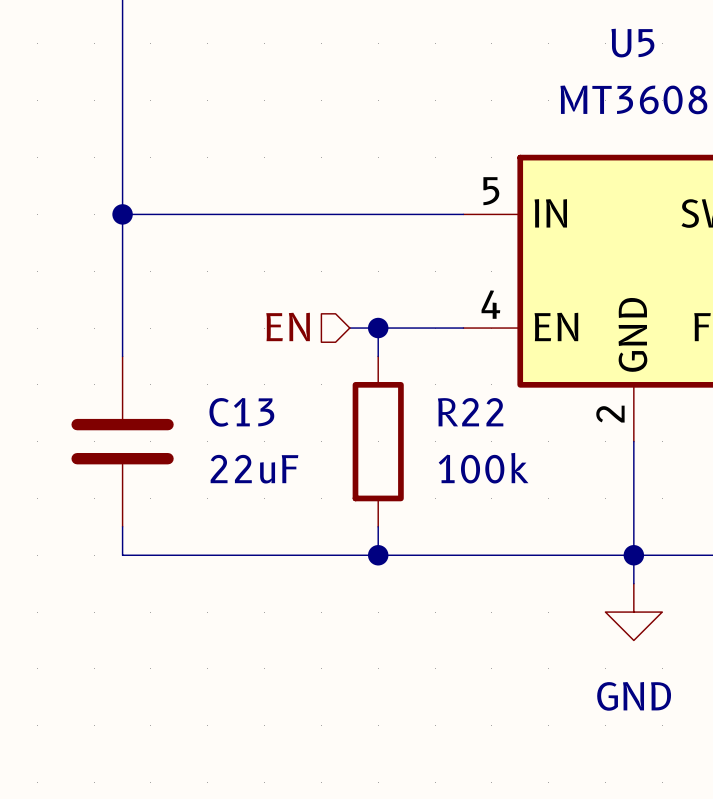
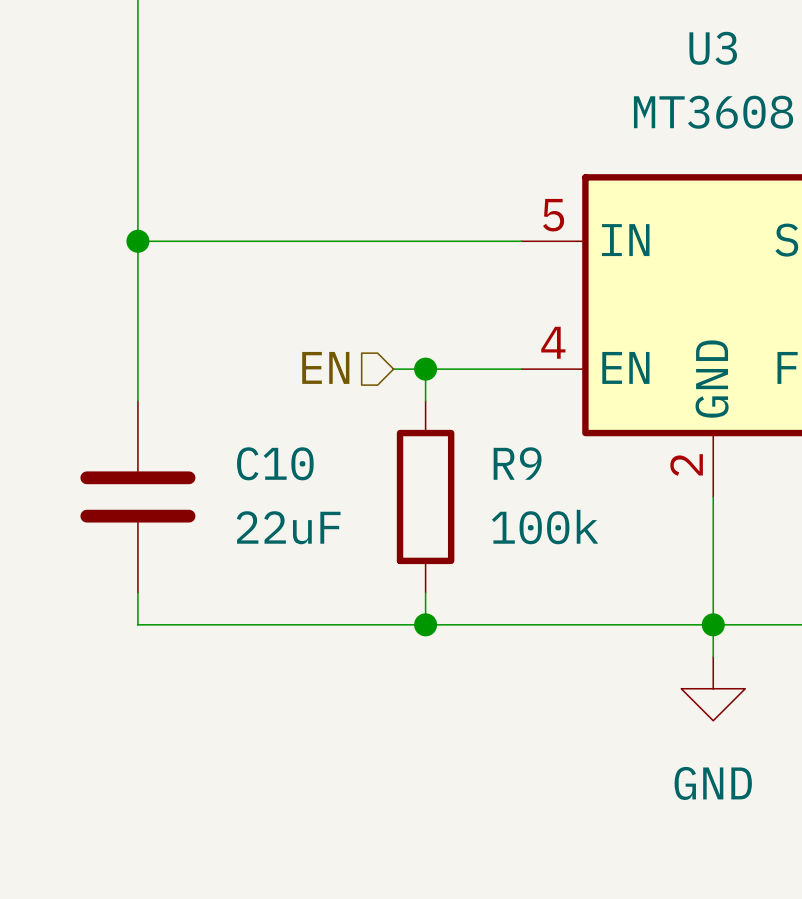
U5 name: U5 (632, 43) -> U3 (713, 48)
C13 name: C13 (241, 412) -> C10 (275, 463)
R22 name: R22 (470, 412) -> R9 (517, 463)

